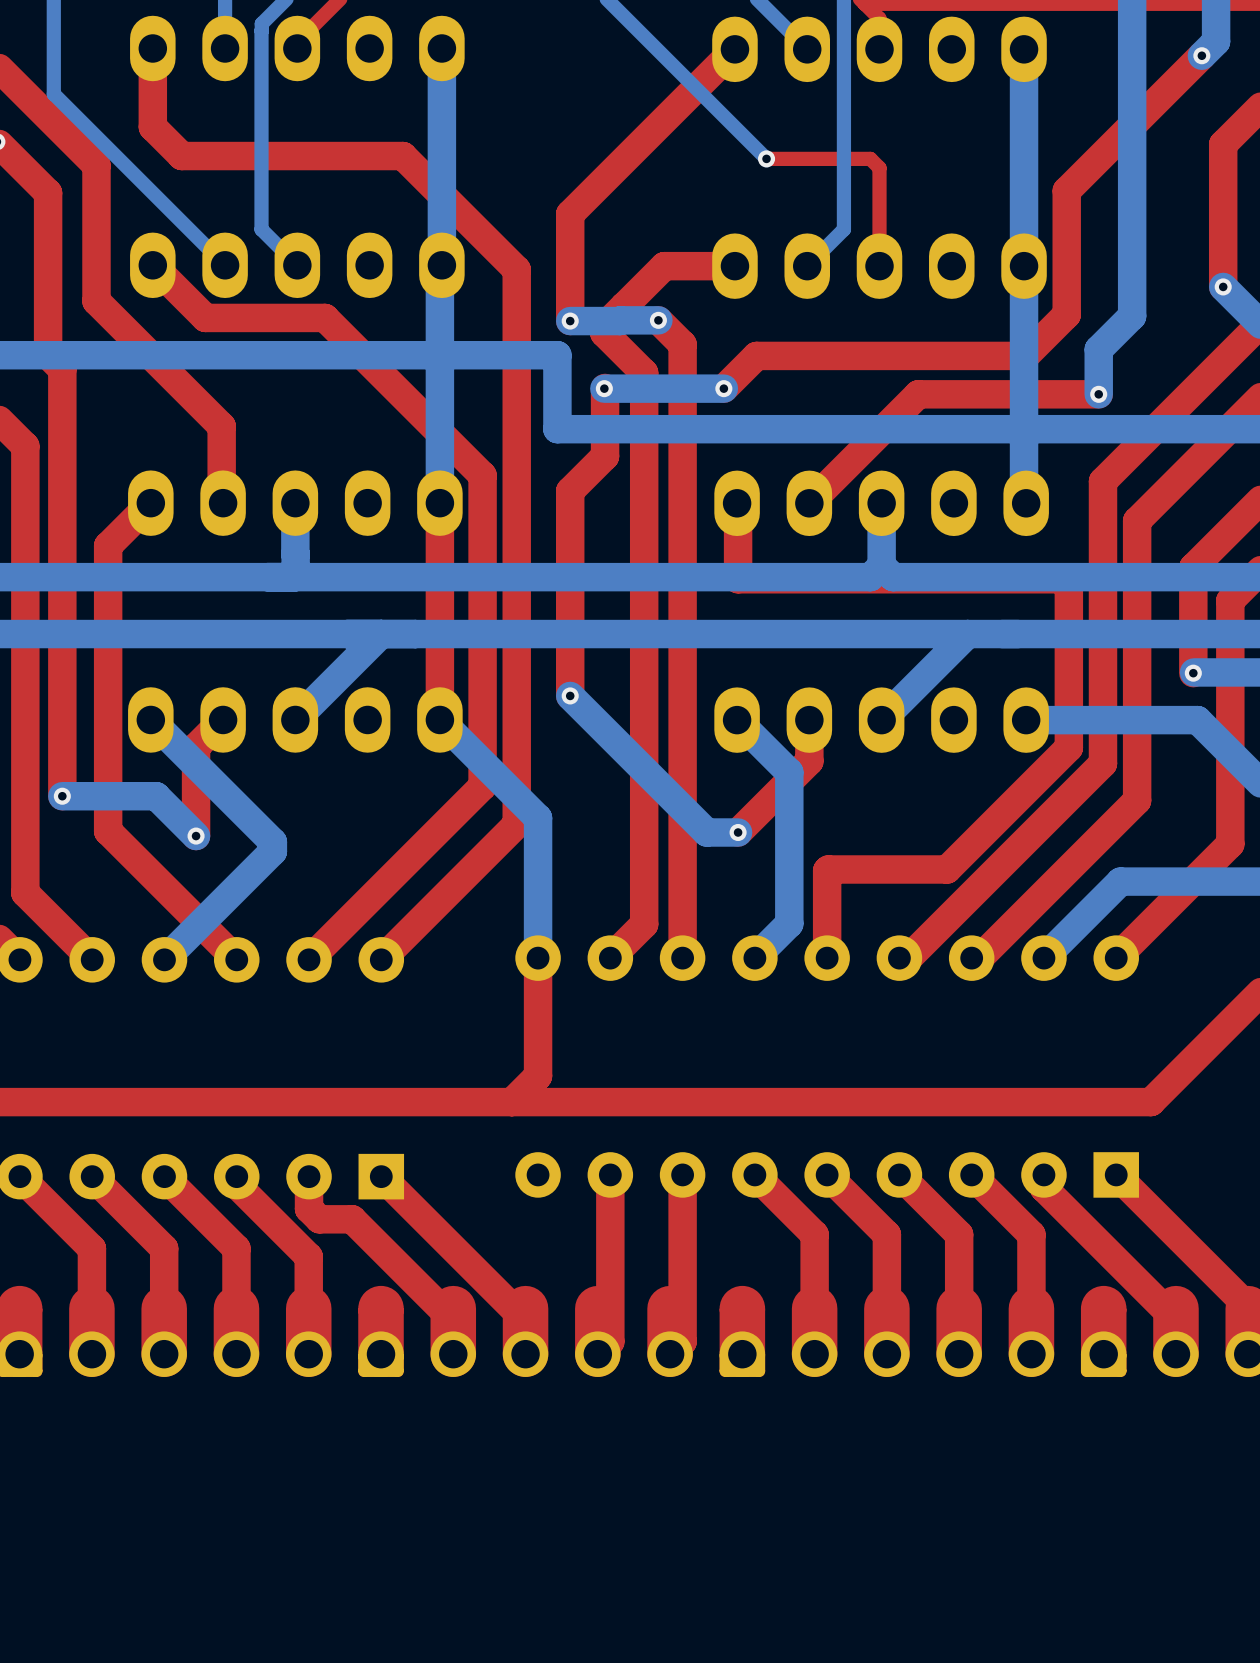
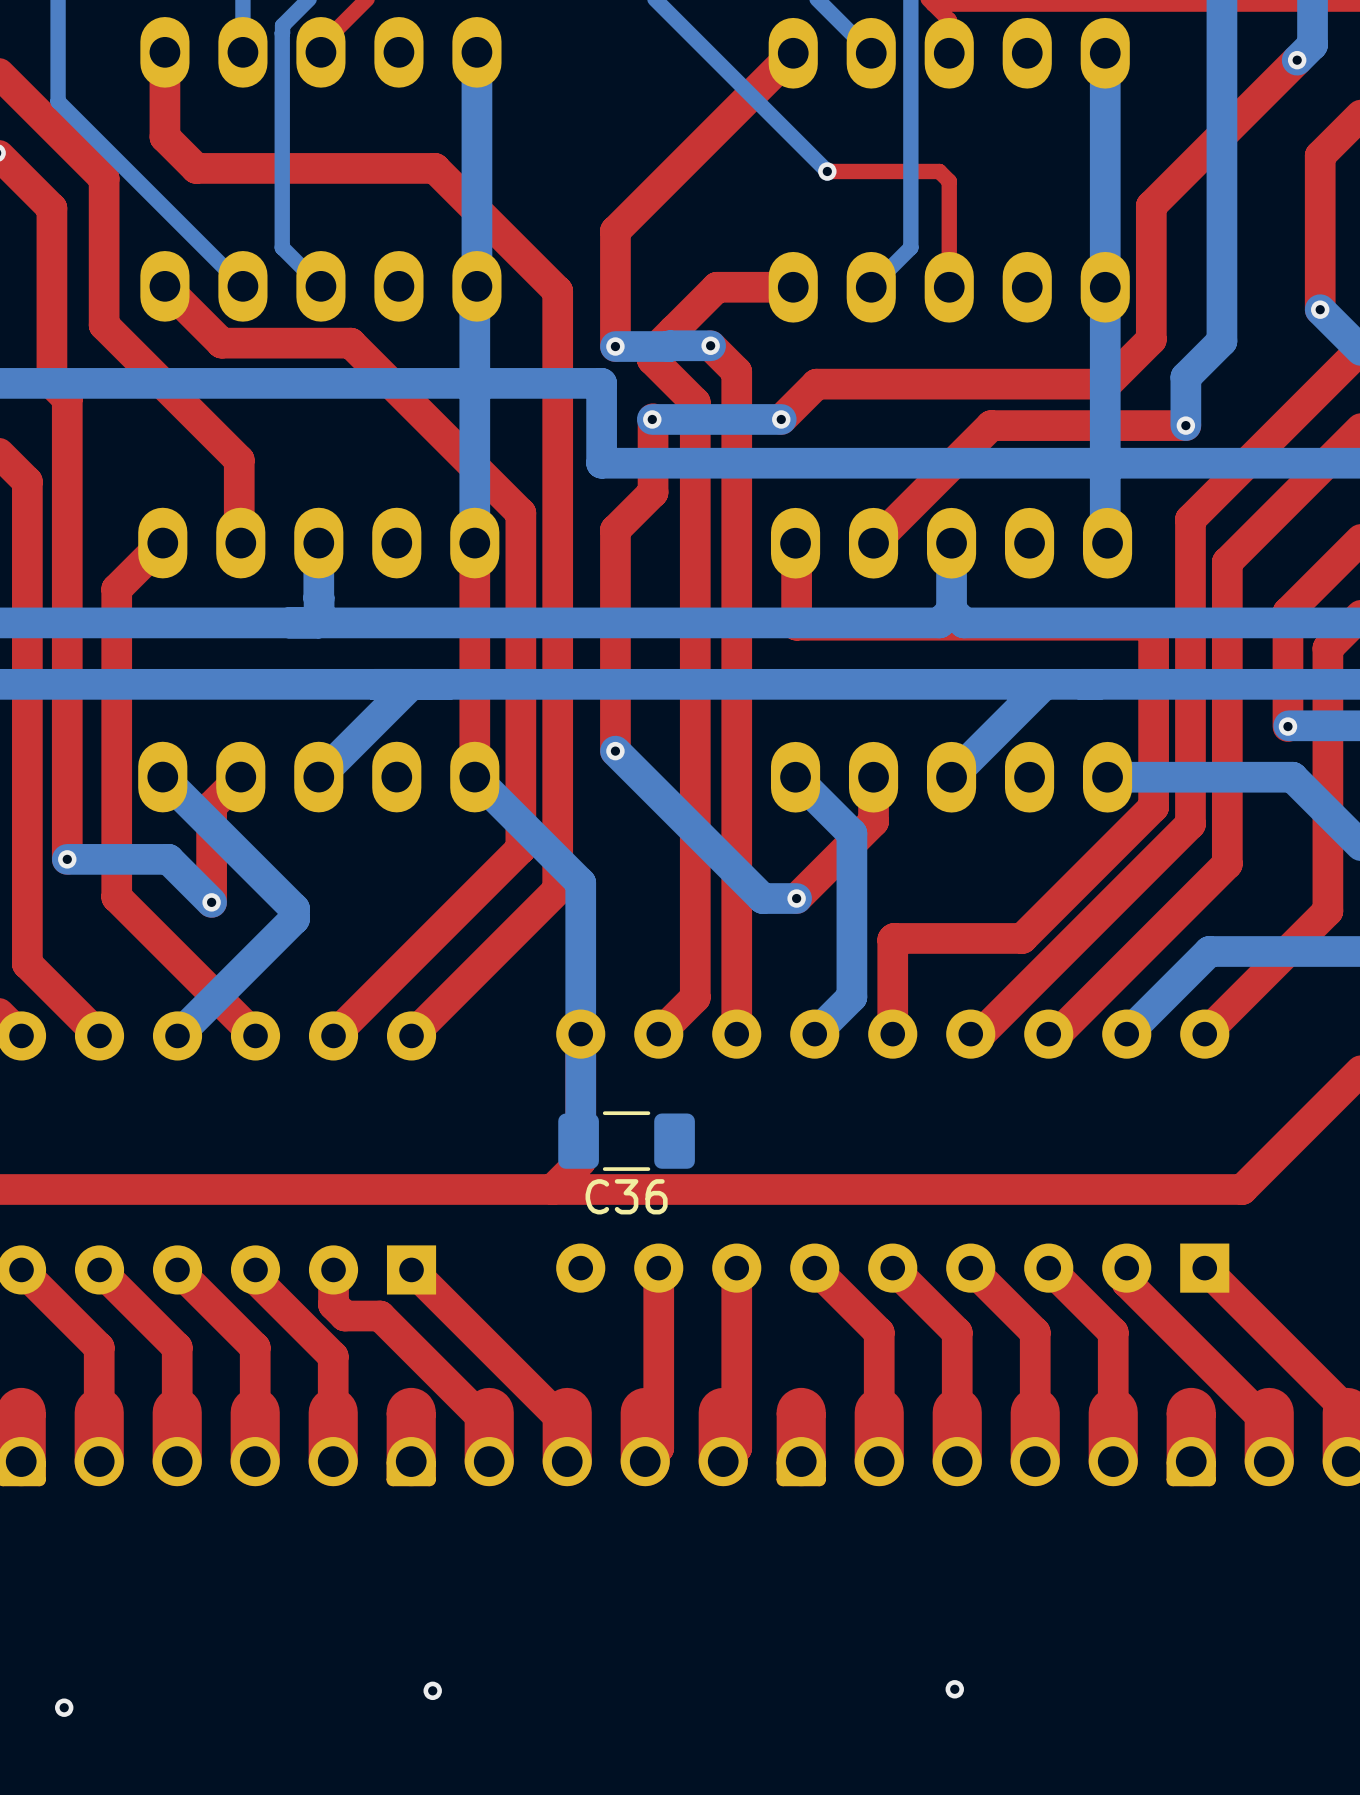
bottom track: none -> (580, 1034) (580, 1138) (578, 1141)
C36: none -> (626, 1141)
via: none -> (954, 1689)
via: none -> (432, 1690)
via: none -> (64, 1707)

